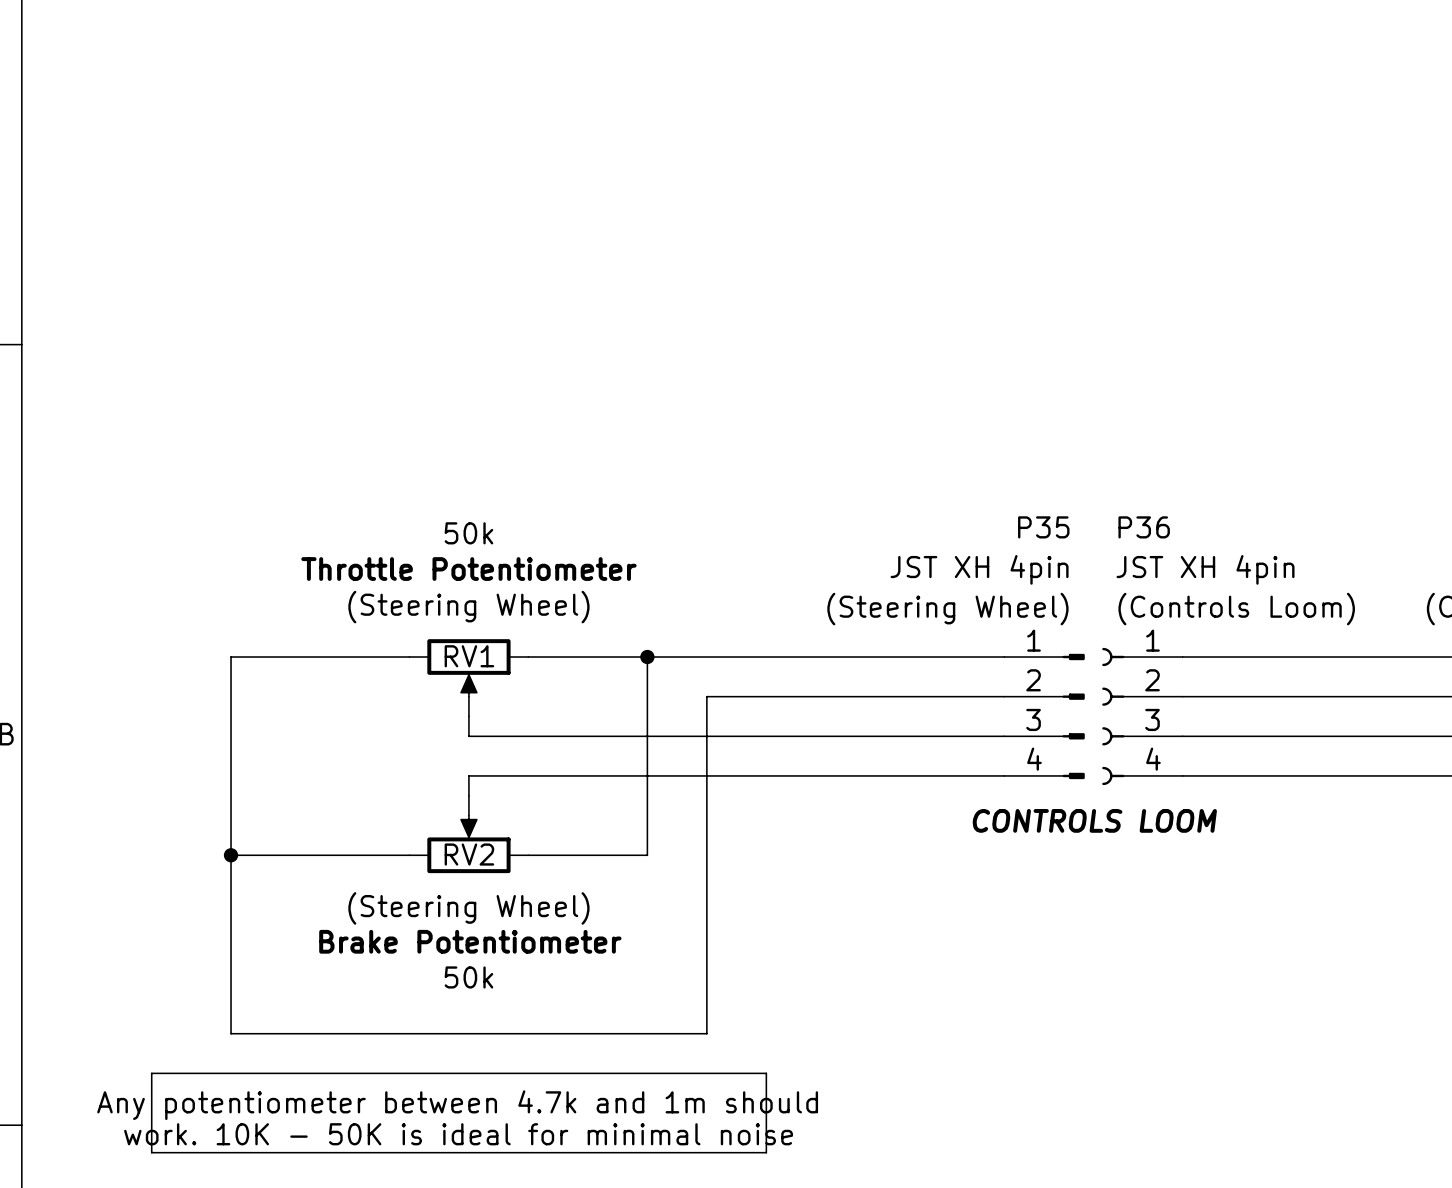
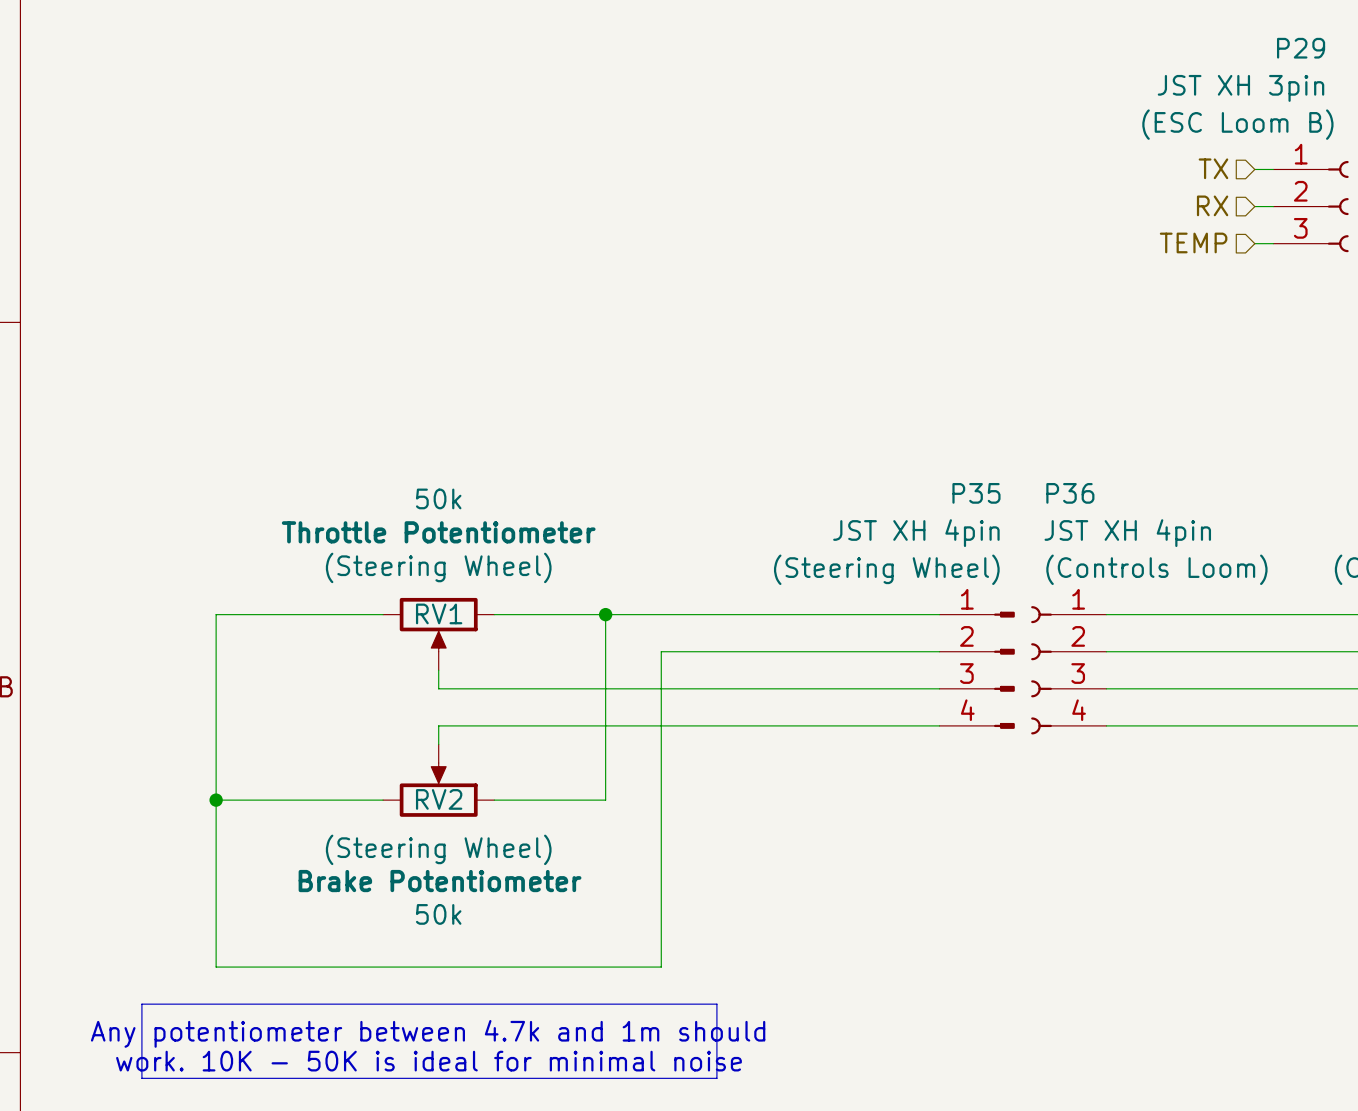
hierarchical label: none -> TX (1213, 168)
wire: none -> (1254, 169) (1273, 169)
hierarchical label: none -> RX (1212, 205)
wire: none -> (1254, 206) (1273, 206)
P29: none -> JST XH 3pin (1311, 206)
hierarchical label: none -> TEMP (1193, 242)
wire: none -> (1254, 243) (1273, 243)
text: CONTROLS LOOM (1094, 820) -> none

